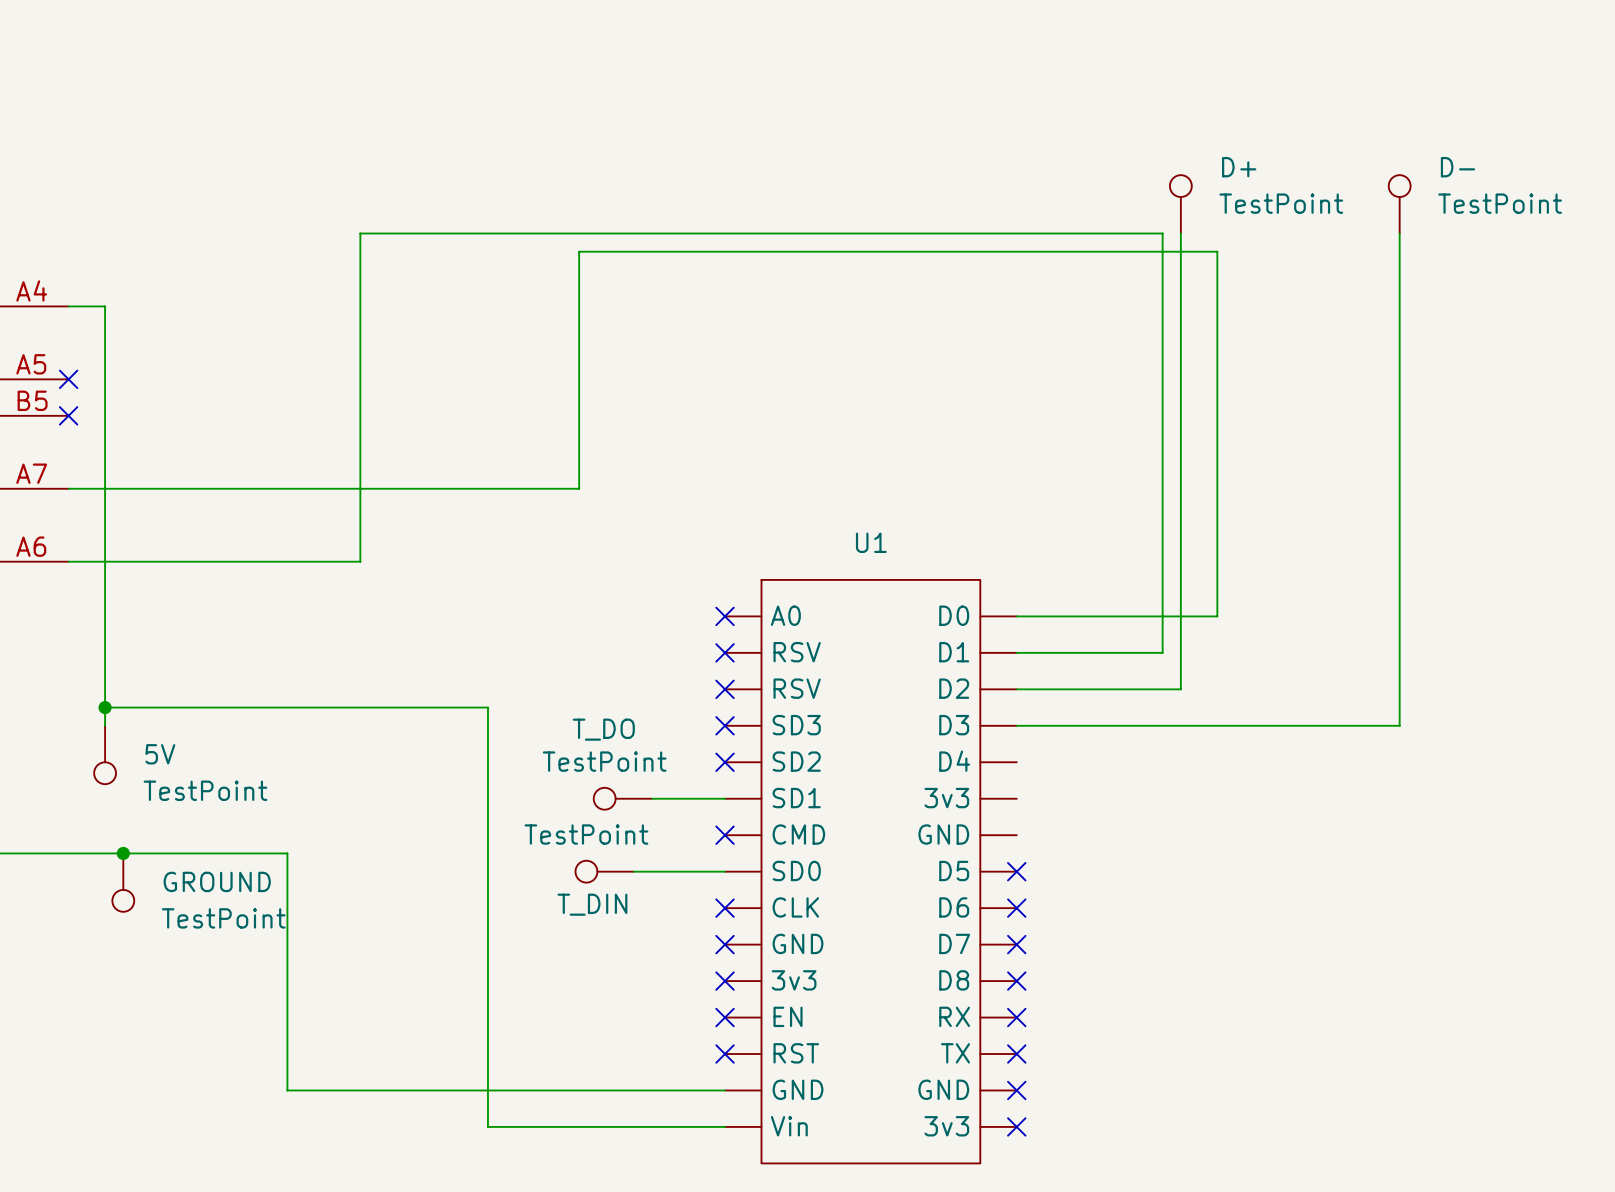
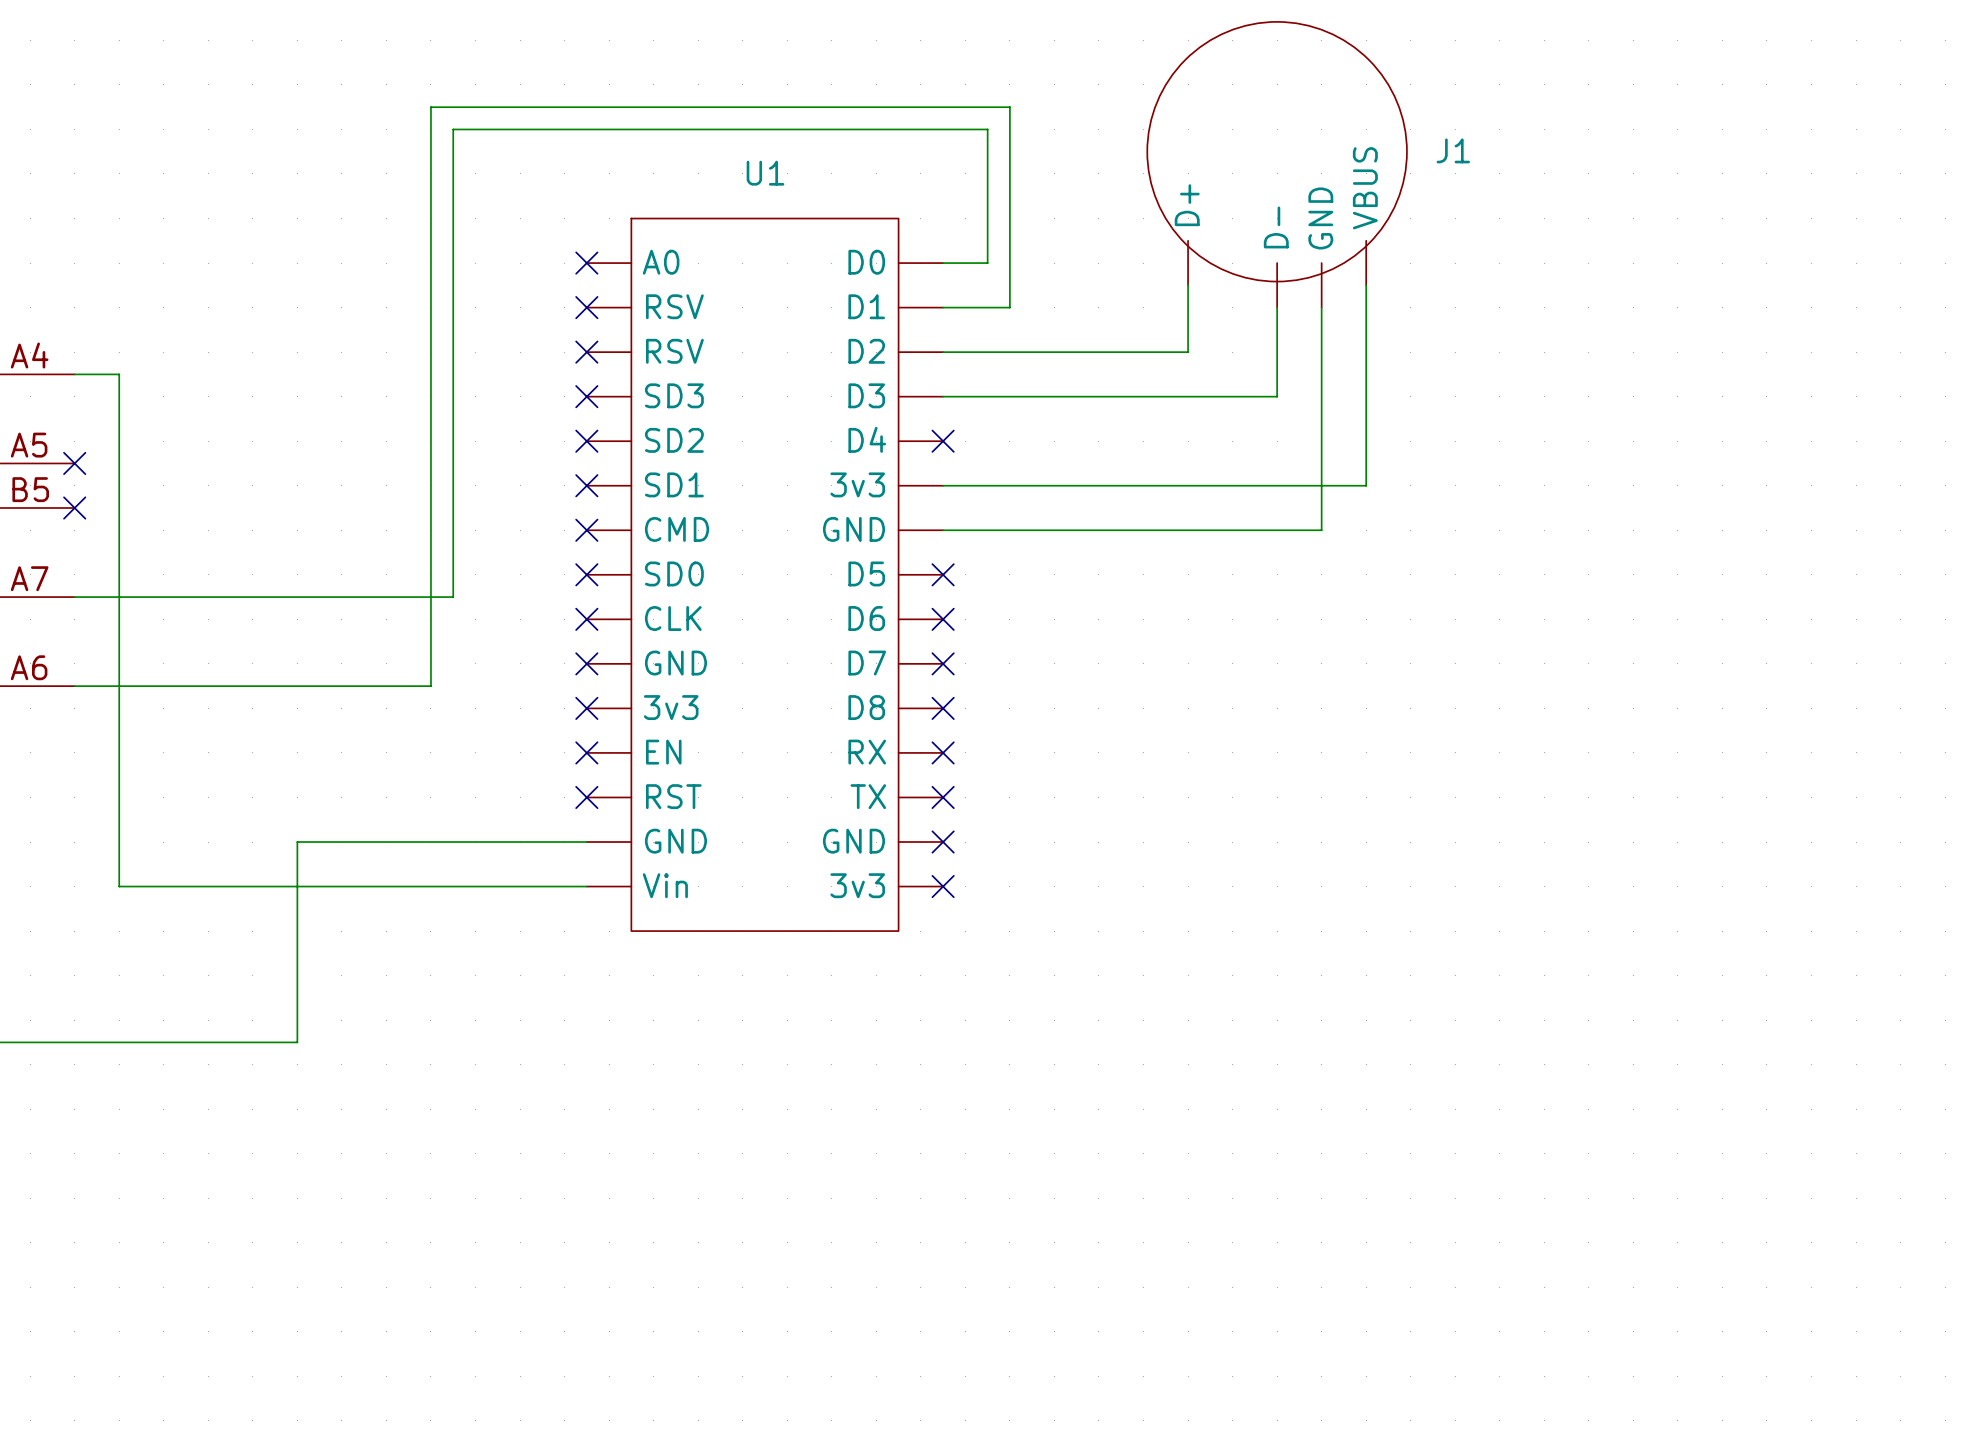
J1: none -> (1277, 164)
D+: TestPoint (1180, 204) -> none
D-: TestPoint (1399, 204) -> none
no-connect mark: none -> (586, 263)
wire: (360, 233) (1162, 233) (1162, 652) (1016, 652) -> (430, 285) (430, 107) (1009, 107) (1009, 307)
wire: none -> (1188, 285) (1188, 352) (943, 352)
wire: none -> (1366, 285) (1366, 485) (943, 485)
wire: (1180, 233) (1180, 689) (1016, 689) -> none
wire: (1399, 233) (1399, 725) (1016, 725) -> none
no-connect mark: none -> (586, 307)
wire: (779, 251) (579, 251) (579, 488) (378, 488) -> (943, 263) (987, 263) (987, 129) (453, 129) (453, 597)
wire: (834, 251) (1217, 251) (1217, 616) (1016, 616) -> none
wire: none -> (1277, 307) (1277, 396) (943, 396)
wire: none -> (1321, 307) (1321, 530) (943, 530)
no-connect mark: none -> (586, 352)
no-connect mark: none -> (586, 396)
no-connect mark: none -> (586, 441)
no-connect mark: none -> (943, 441)
no-connect mark: none -> (586, 485)
no-connect mark: none -> (586, 530)
no-connect mark: none -> (586, 574)
no-connect mark: none -> (943, 574)
no-connect mark: none -> (586, 619)
no-connect mark: none -> (943, 619)
no-connect mark: none -> (586, 663)
no-connect mark: none -> (943, 663)
no-connect mark: none -> (586, 708)
no-connect mark: none -> (943, 708)
no-connect mark: none -> (586, 752)
no-connect mark: (725, 616) -> none
no-connect mark: none -> (943, 752)
no-connect mark: none -> (586, 797)
no-connect mark: (725, 652) -> none
no-connect mark: none -> (943, 797)
no-connect mark: (725, 689) -> none
no-connect mark: none -> (943, 842)
wire: (105, 707) (487, 707) (487, 1126) (725, 1126) -> none
junction: (105, 707) -> none
wire: none -> (119, 886) (586, 886)
no-connect mark: (725, 725) -> none
no-connect mark: none -> (943, 886)
5V: TestPoint (105, 754) -> none
no-connect mark: (725, 762) -> none
T_DO: TestPoint (622, 798) -> none
wire: (652, 798) (725, 798) -> none
no-connect mark: (725, 835) -> none
junction: (123, 853) -> none
wire: (250, 853) (287, 853) (287, 1090) (725, 1090) -> (297, 1042) (297, 842) (586, 842)
T_DIN: TestPoint (604, 871) -> none
wire: (633, 871) (725, 871) -> none
U1 position: (870, 871) -> (764, 574)
no-connect mark: (1016, 871) -> none
GROUND: TestPoint (123, 882) -> none
no-connect mark: (725, 908) -> none
no-connect mark: (1016, 908) -> none
no-connect mark: (725, 944) -> none
no-connect mark: (1016, 944) -> none
no-connect mark: (725, 981) -> none
no-connect mark: (1016, 981) -> none
no-connect mark: (725, 1017) -> none
no-connect mark: (1016, 1017) -> none
no-connect mark: (725, 1054) -> none
no-connect mark: (1016, 1054) -> none
no-connect mark: (1016, 1090) -> none
no-connect mark: (1016, 1126) -> none

